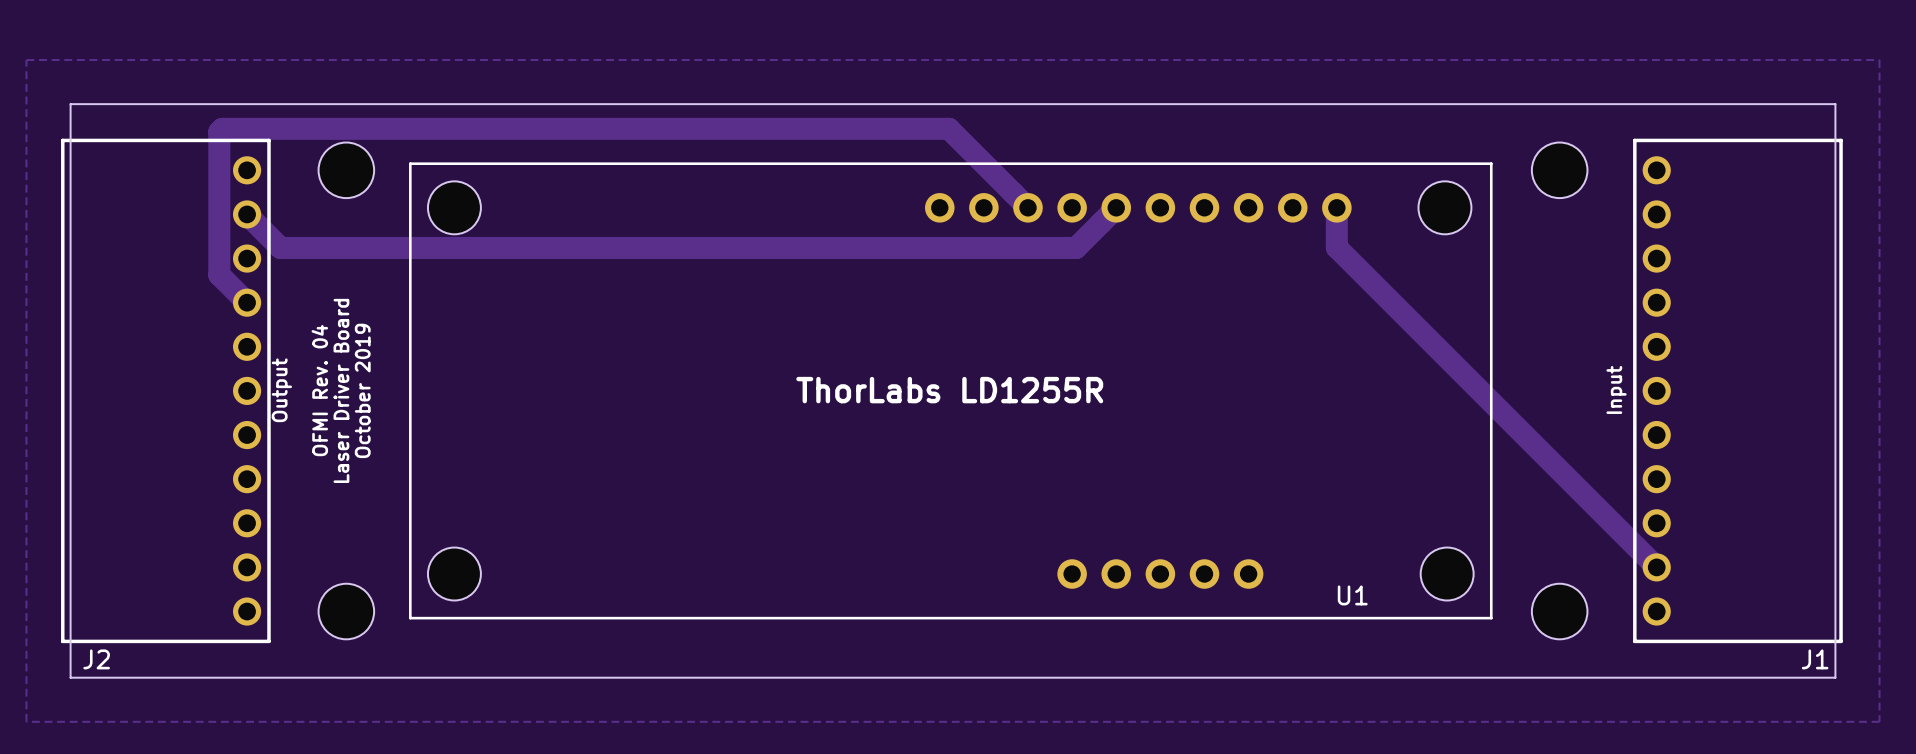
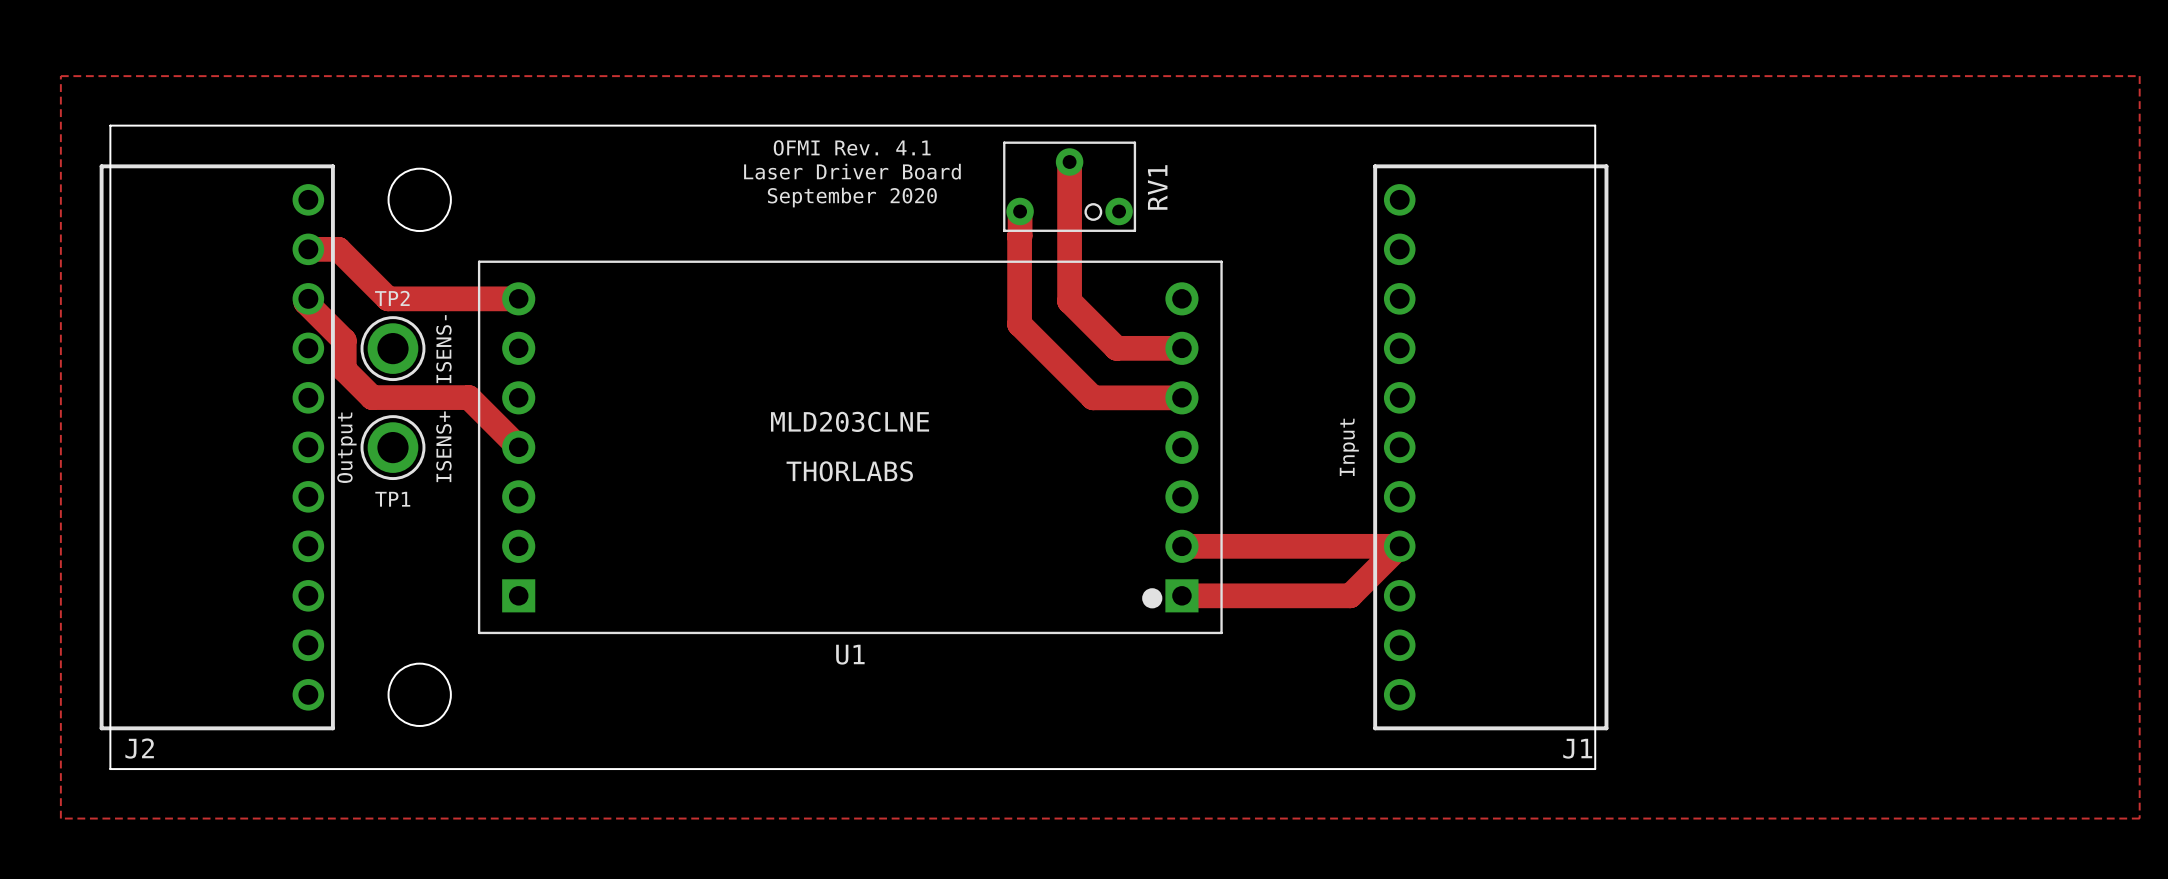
board edge: (1394, 104) (1835, 104) (1835, 677) (1394, 677) -> (1595, 125) (1595, 769)
text: none -> OFMI Rev. 4.1 (852, 147)
track: none -> (1069, 162) (1069, 301) (1116, 348) (1181, 348)
text: none -> Laser Driver Board (852, 171)
RV1: none -> (1069, 186)
U1 footprint: [409, 162, 1493, 620] -> [477, 260, 1223, 635]
text: none -> September 2020 (852, 197)
part: (1559, 170) -> none
track: none -> (1020, 211) (1019, 324) (1093, 397) (1181, 397)
track: (1028, 207) (949, 128) (222, 128) (219, 131) (219, 274) (247, 302) -> none
track: (1116, 207) (1076, 247) (280, 247) (247, 214) -> none
track: (1336, 207) (1336, 247) (1656, 567) -> none
track: none -> (305, 249) (338, 249) (388, 298) (518, 298)
track: none -> (305, 298) (305, 302) (344, 340) (344, 369) (372, 397) (468, 397) (518, 447)
TP2: none -> (392, 348)
text: none -> ISENS- (443, 349)
text: none -> Input (1349, 447)
text: Input (1616, 389) -> none
text: OFMI Rev. 04 (319, 390) -> none
text: Laser Driver Board (341, 390) -> none
text: October 2019 (362, 390) -> ISENS+ (443, 446)
J1 position: (1737, 390) -> (1490, 447)
TP1: none -> (392, 447)
track: none -> (1181, 546) (1399, 546) (1350, 595) (1181, 595)
U1 name position: U1 (1352, 595) -> U1 (850, 654)
part: (1559, 611) -> none

